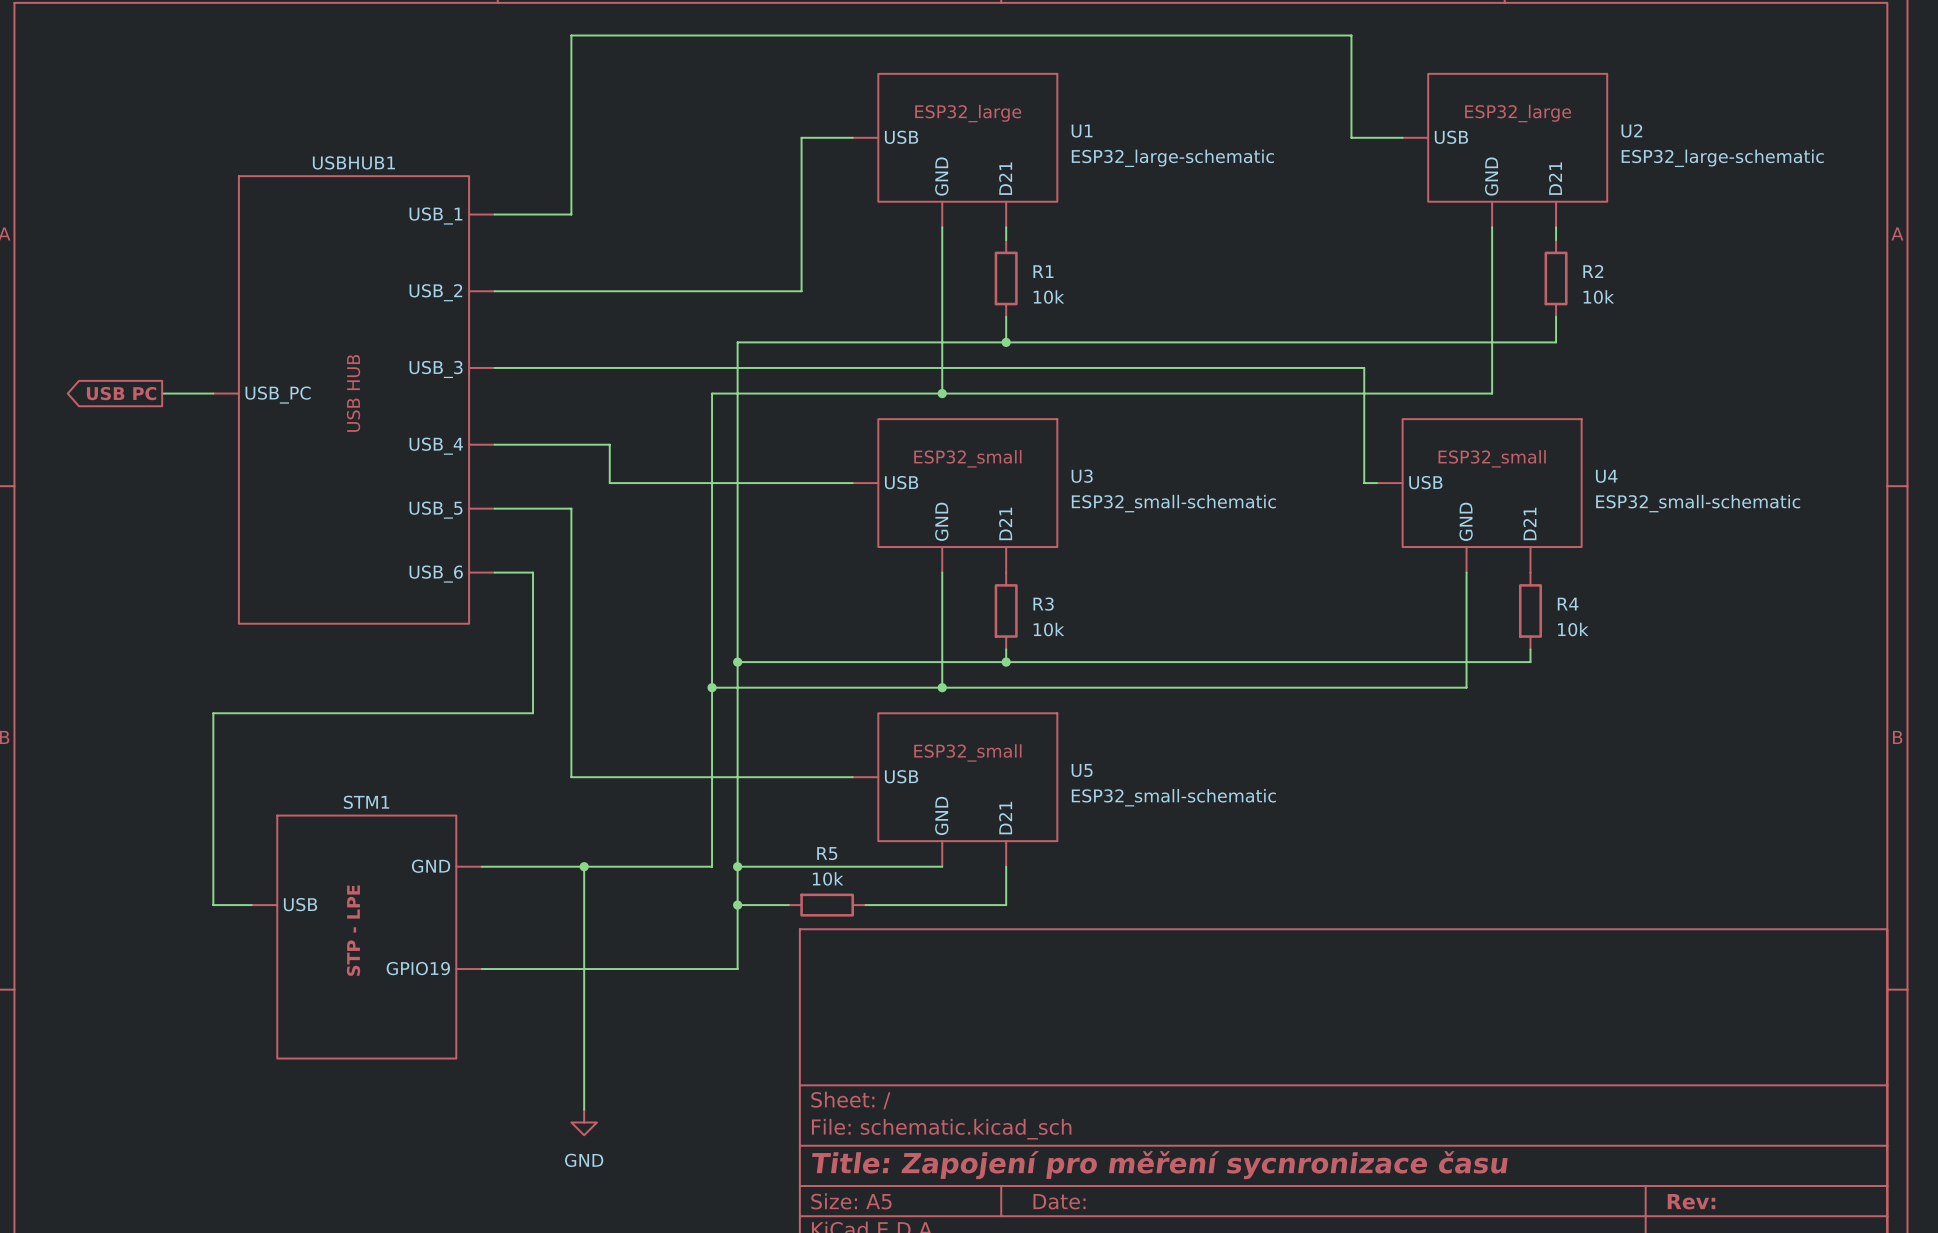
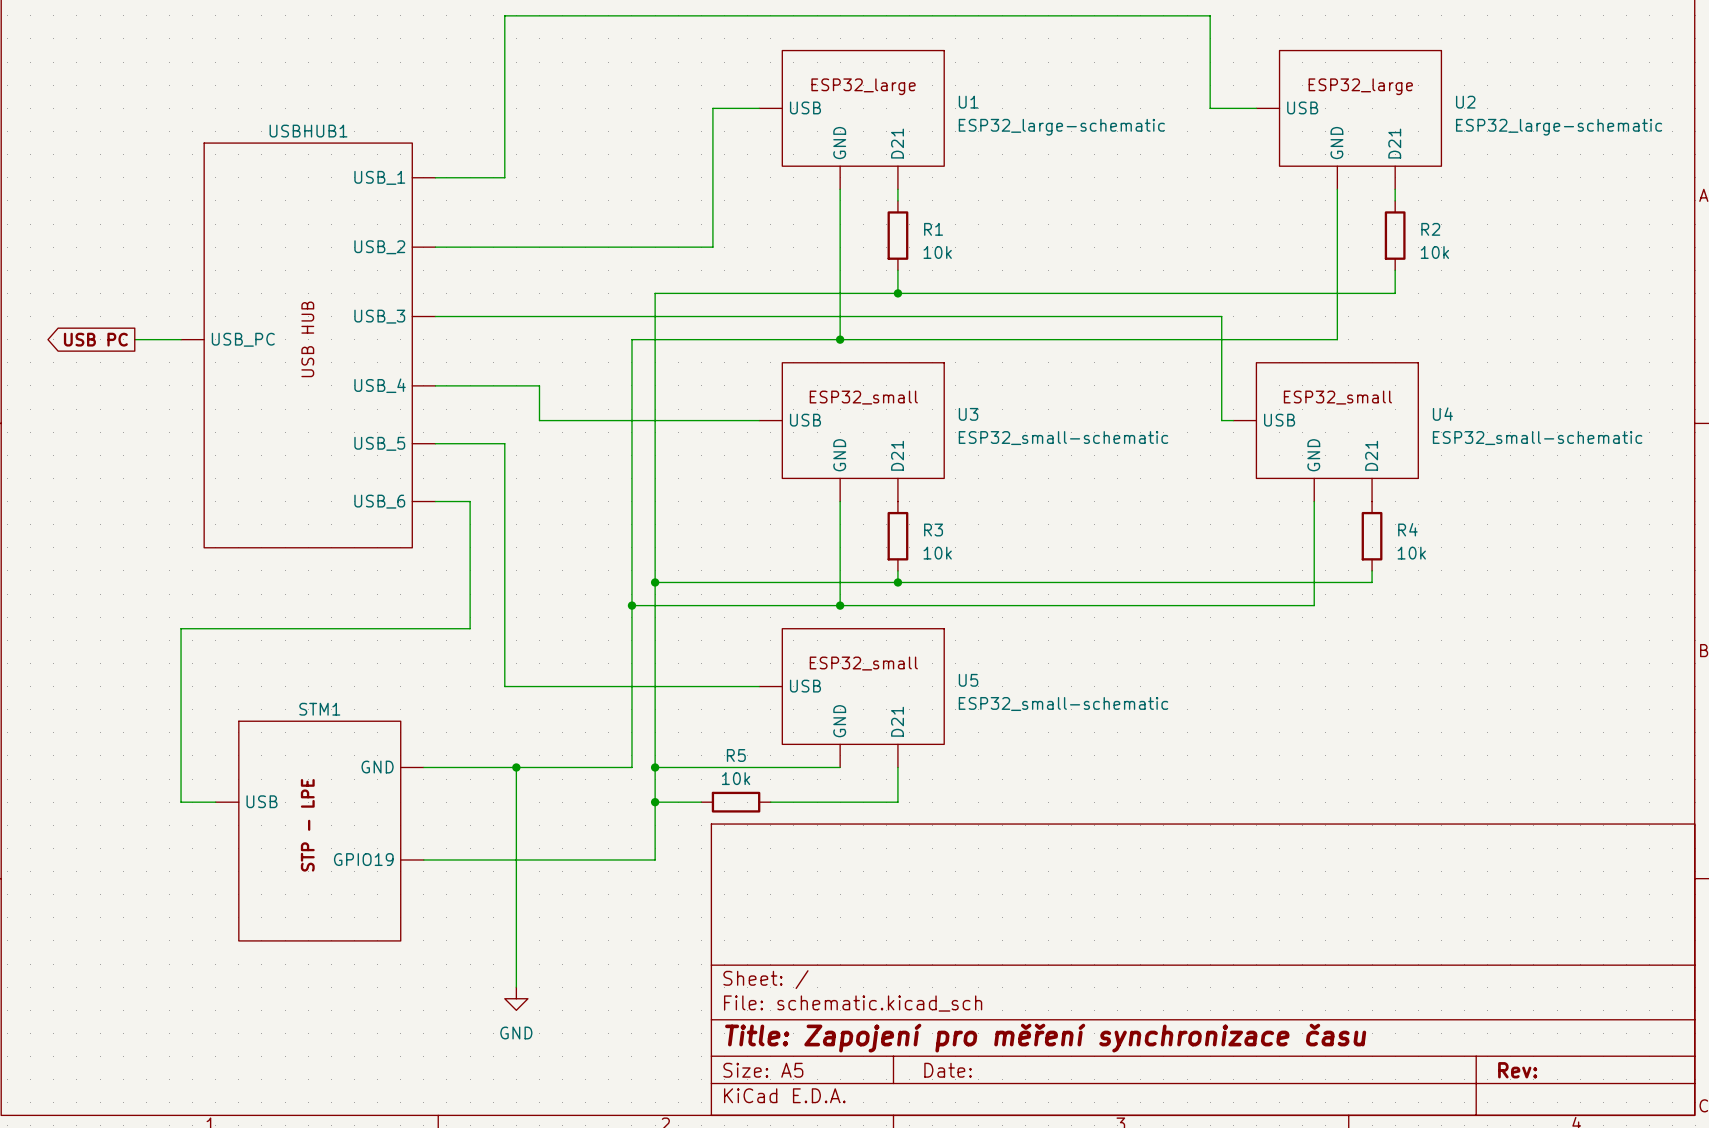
title block: Title: Zapojení pro měření sycnronizace času (1159, 1165) -> Title: Zapojení pro měření synchronizace času (1045, 1038)

